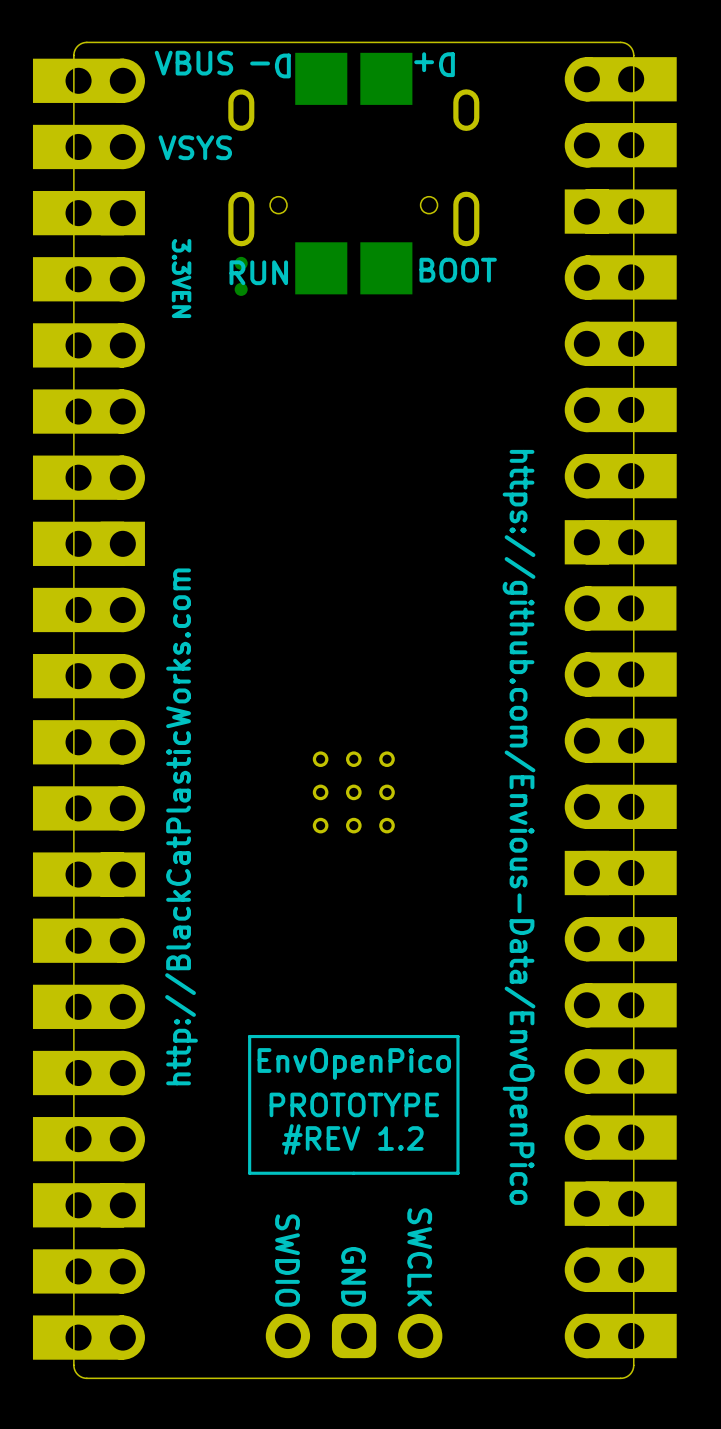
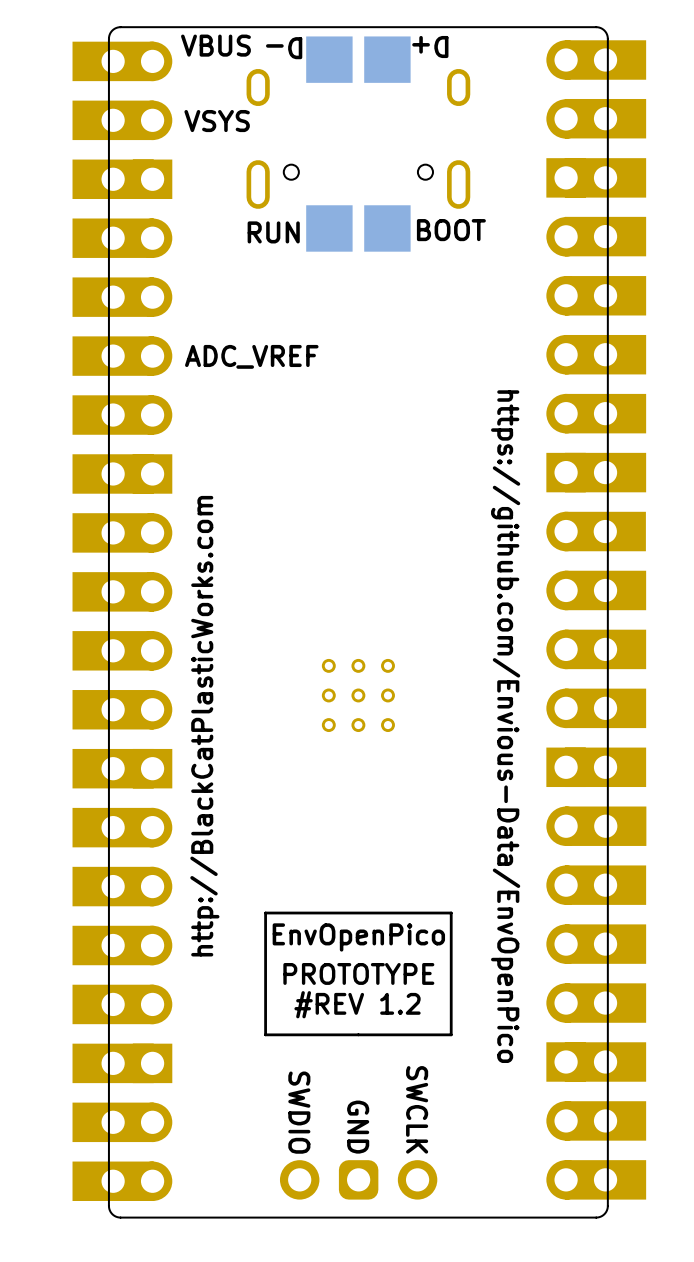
part: (241, 276) -> none
text: 3.3VEN (181, 278) -> none
text: none -> ADC_VREF (251, 356)

